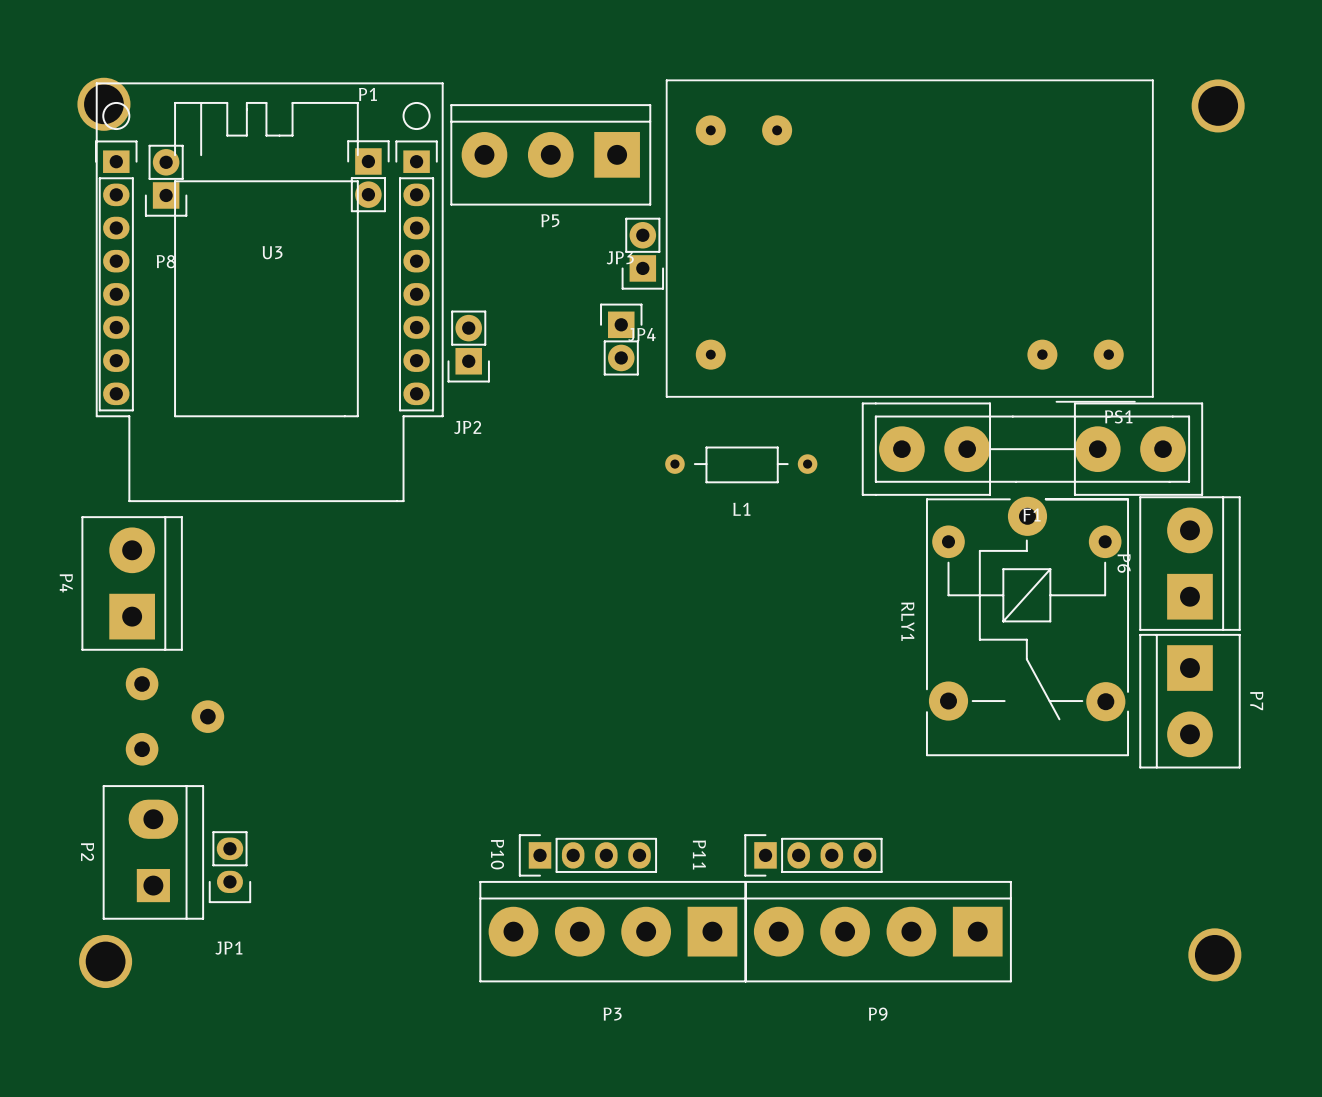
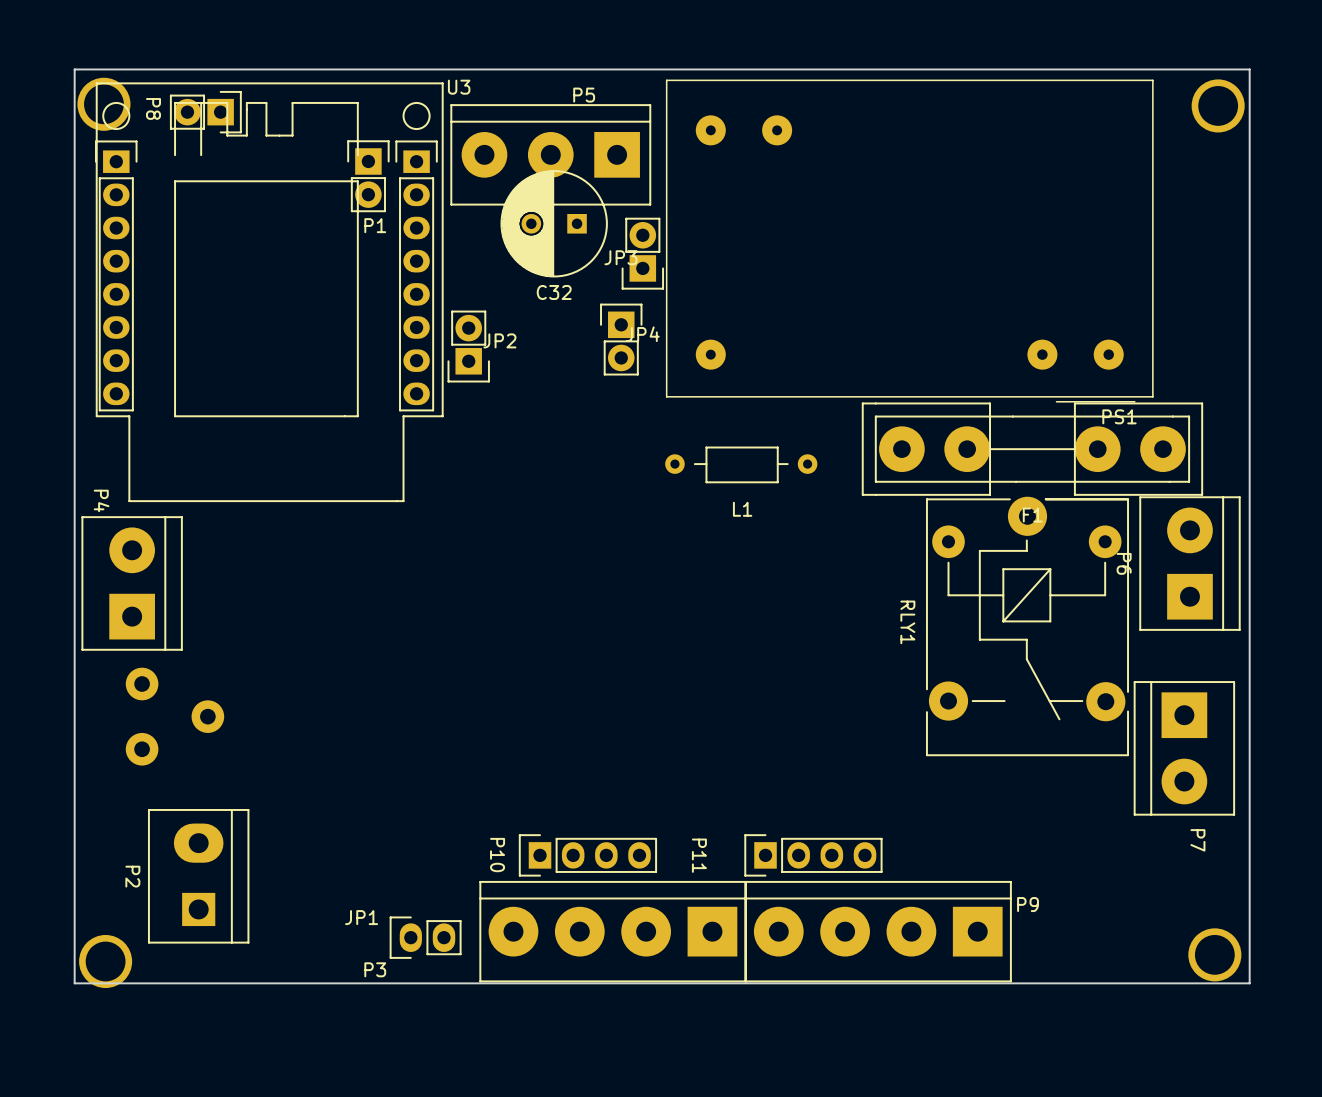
board edge: none -> (1249, 69) (74, 69) (74, 983) (1249, 983) (1249, 69)
P1 name position: P1 (368, 94) -> P1 (375, 225)
P8 rotation: 0° (166, 180) -> 90° counterclockwise (205, 112)
P8 position: (166, 180) -> (205, 112)
P5 name position: P5 (550, 220) -> P5 (584, 95)
C32: none -> (554, 223)
U3 name position: U3 (272, 252) -> U3 (459, 87)
P8 name position: P8 (166, 261) -> P8 (153, 108)
JP2 name position: JP2 (467, 427) -> JP2 (499, 340)
P4 name position: P4 (66, 583) -> P4 (101, 500)
P7 name position: P7 (1256, 700) -> P7 (1197, 840)
P7 position: (1189, 701) -> (1184, 748)
JP1 footprint: [208, 831, 252, 904] -> [389, 916, 462, 959]
P2 position: (153, 852) -> (198, 876)
JP1 name position: JP1 (228, 948) -> JP1 (361, 917)
P3 name position: P3 (612, 1014) -> P3 (375, 969)
P9 name position: P9 (878, 1014) -> P9 (1028, 904)

